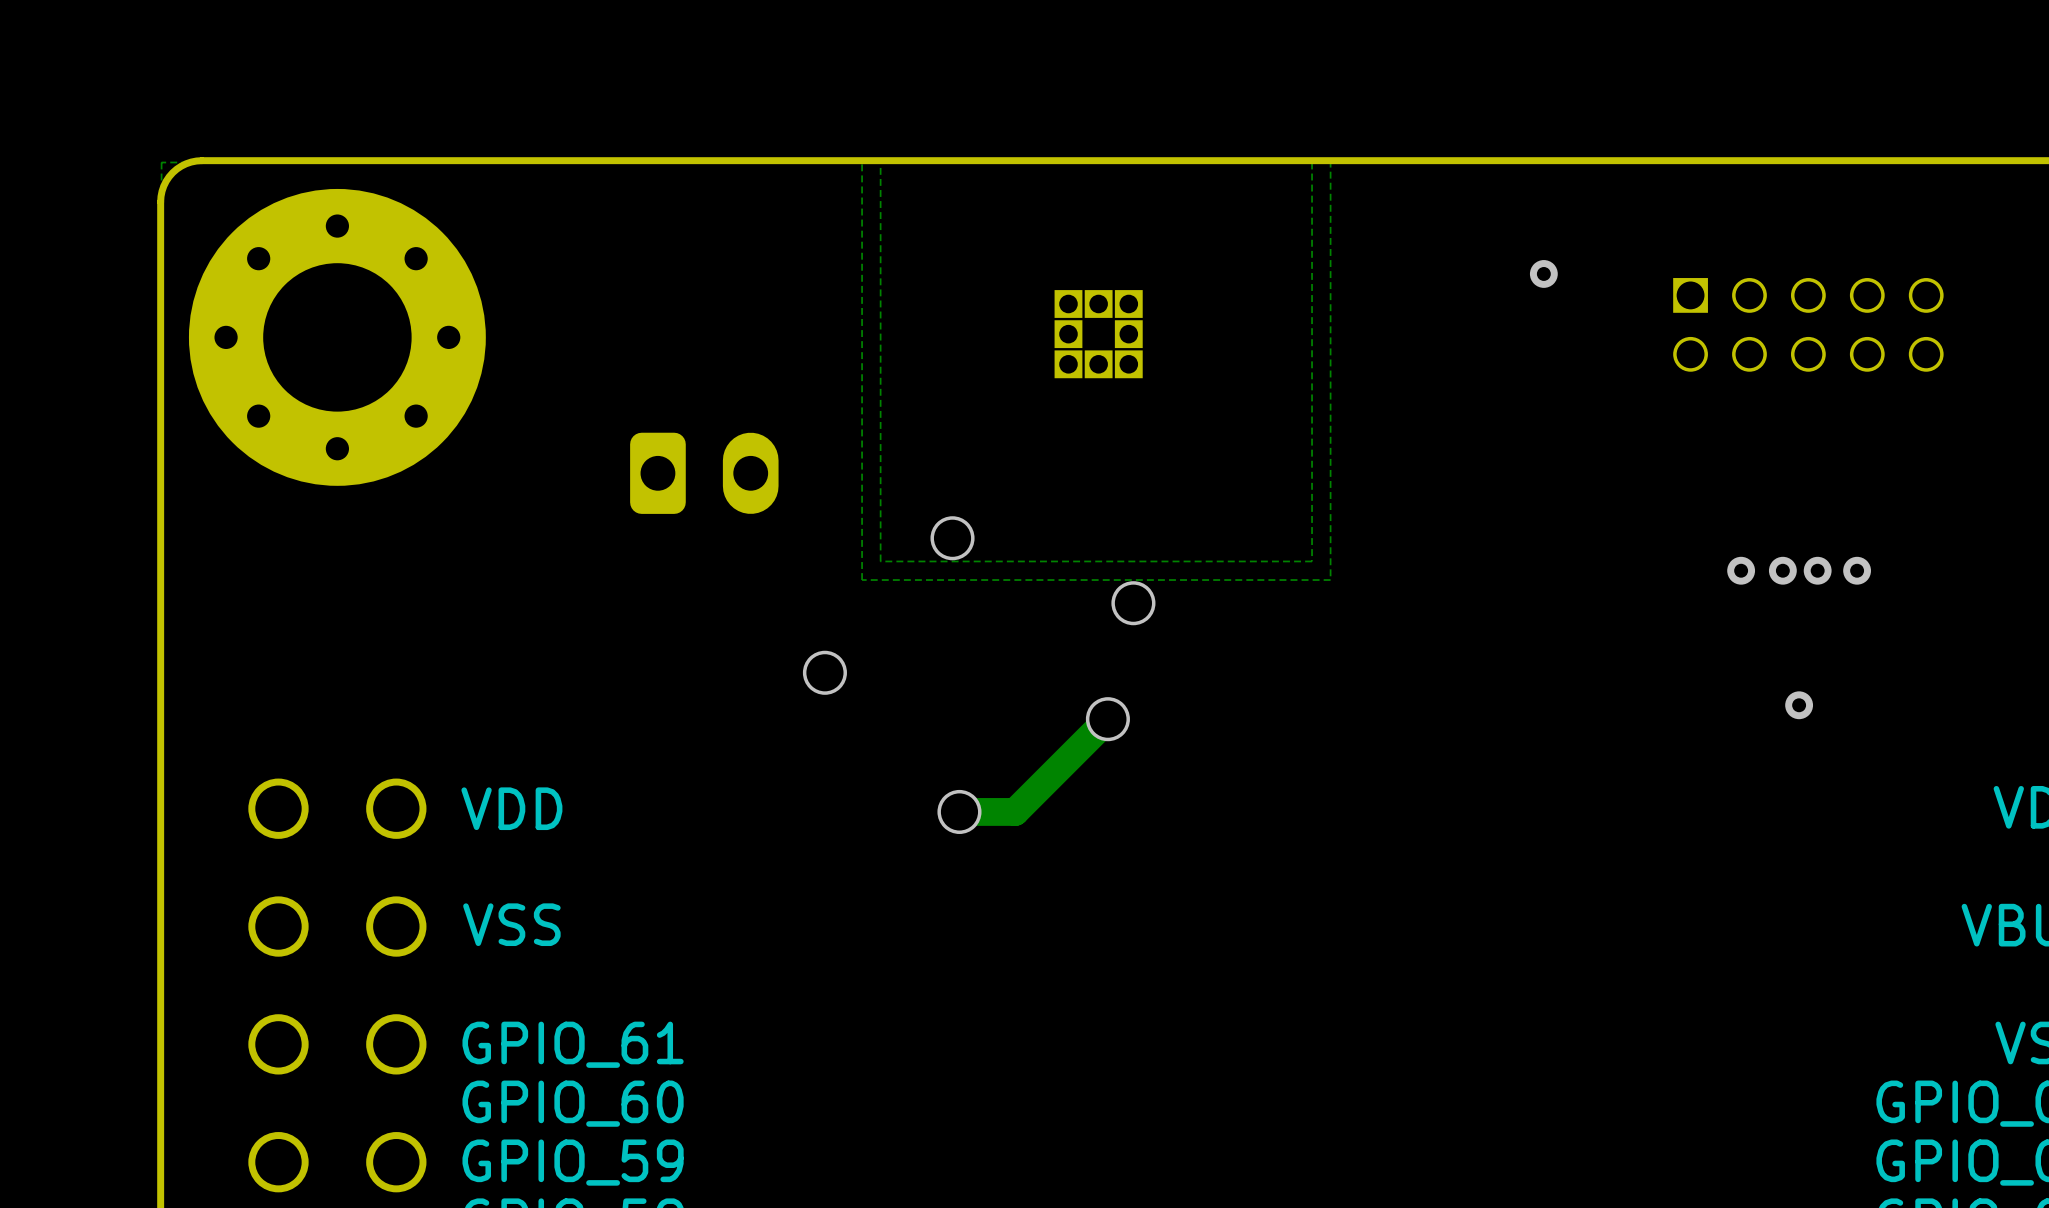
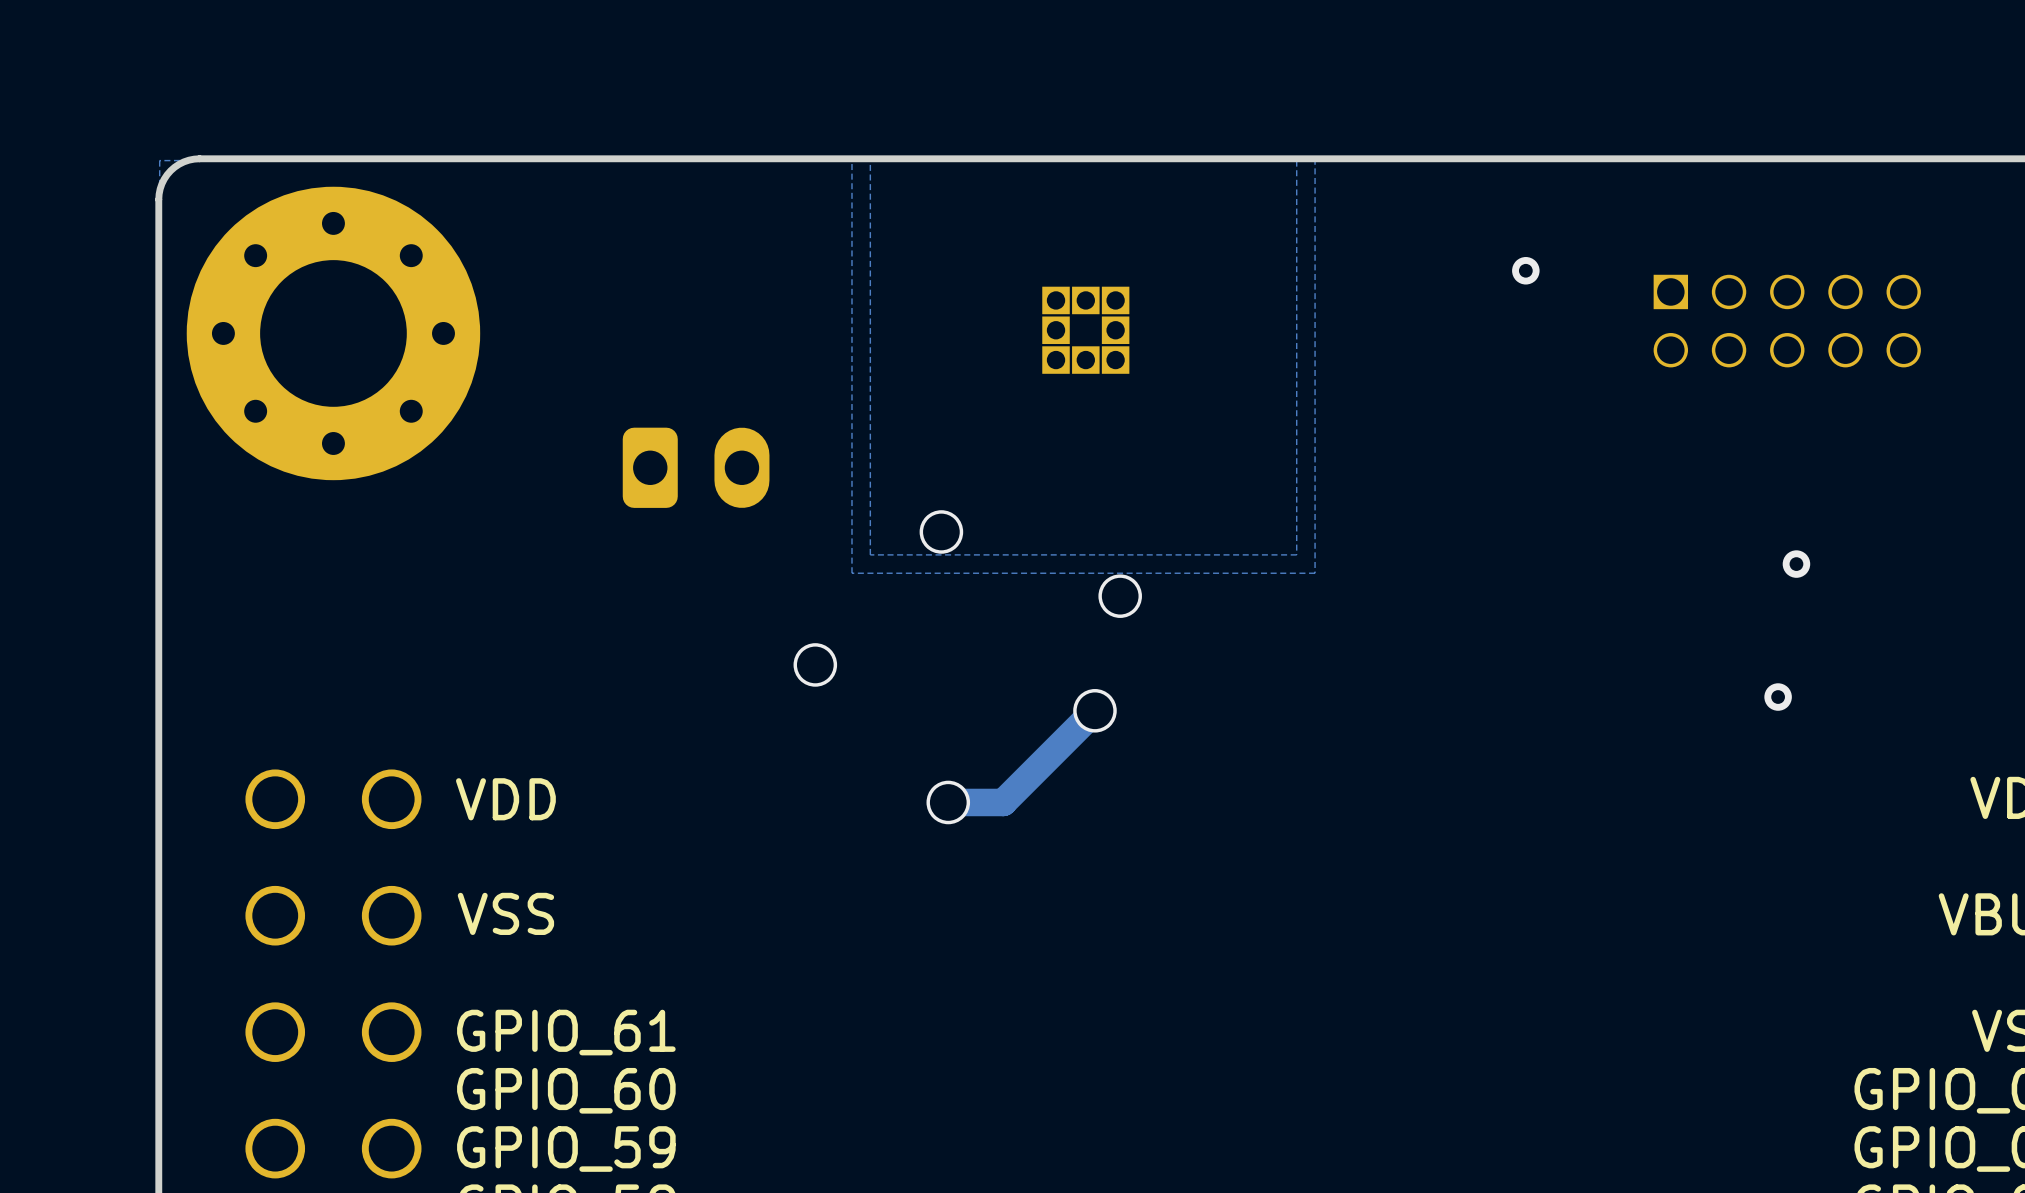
via: (1741, 570) -> none
via: (1782, 570) -> none
via: (1857, 570) -> none

